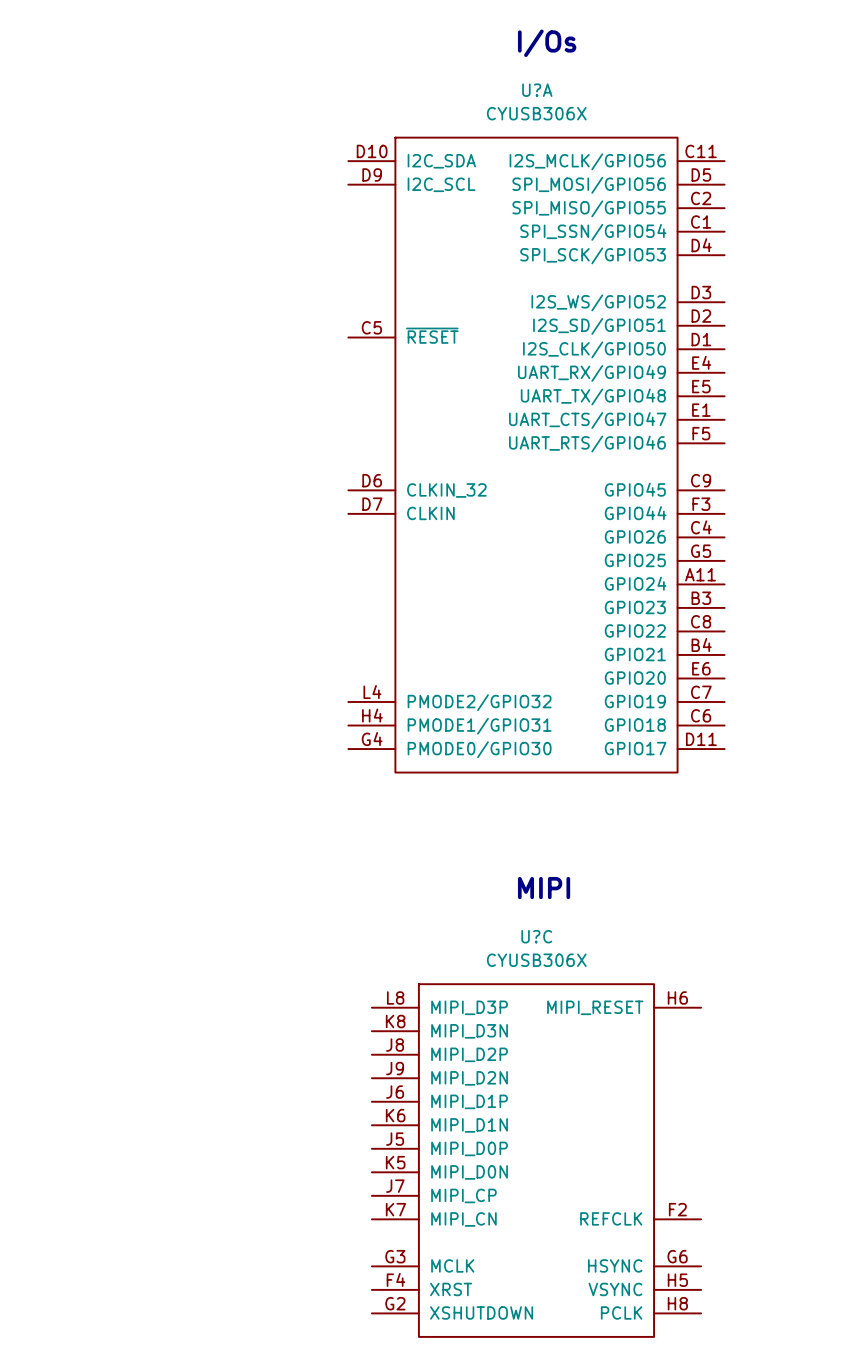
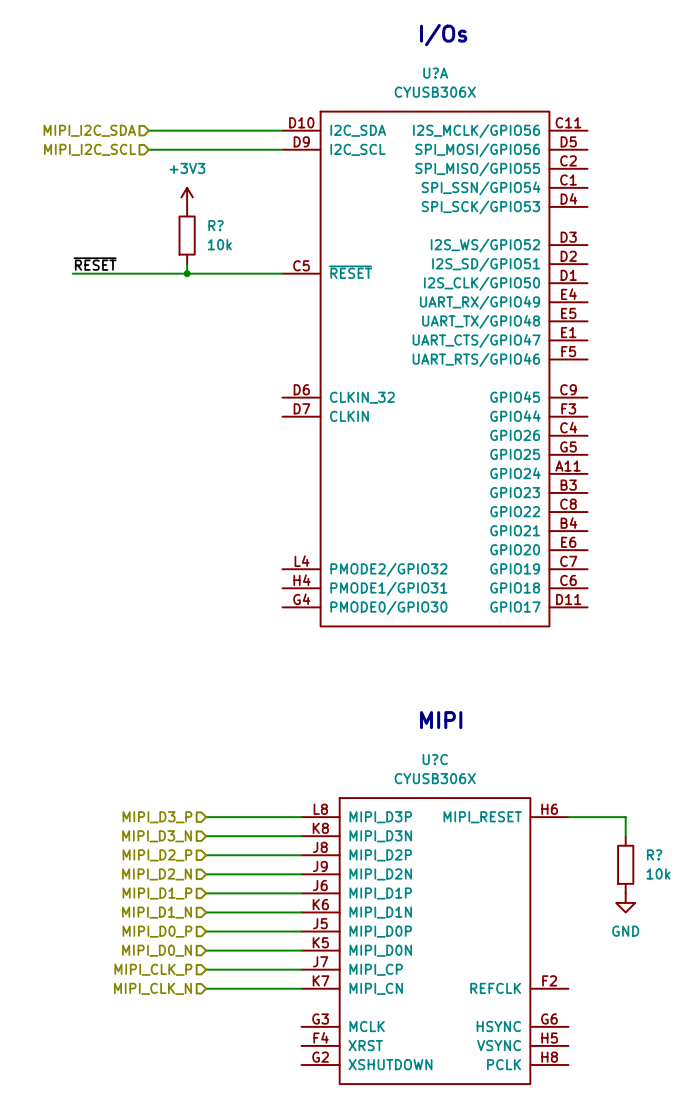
hierarchical label: none -> MIPI_I2C_SDA (89, 130)
wire: none -> (148, 130) (282, 130)
hierarchical label: none -> MIPI_I2C_SCL (90, 149)
wire: none -> (148, 149) (282, 149)
power symbol: none -> +3V3 (187, 197)
R?: none -> 10k (187, 235)
label: none -> ~{RESET} (95, 264)
wire: none -> (187, 264) (187, 273)
wire: none -> (72, 273) (282, 273)
junction: none -> (187, 273)
hierarchical label: none -> MIPI_D3_P (157, 817)
wire: none -> (206, 817) (301, 817)
wire: none -> (568, 817) (625, 817) (625, 836)
hierarchical label: none -> MIPI_D3_N (157, 836)
wire: none -> (206, 836) (301, 836)
hierarchical label: none -> MIPI_D2_P (157, 855)
wire: none -> (206, 855) (301, 855)
R?: none -> 10k (625, 864)
hierarchical label: none -> MIPI_D2_N (157, 874)
wire: none -> (206, 874) (301, 874)
hierarchical label: none -> MIPI_D1_P (157, 893)
wire: none -> (206, 893) (301, 893)
power symbol: none -> GND (625, 902)
hierarchical label: none -> MIPI_D1_N (157, 912)
wire: none -> (206, 912) (301, 912)
hierarchical label: none -> MIPI_D0_P (157, 931)
wire: none -> (206, 931) (301, 931)
hierarchical label: none -> MIPI_D0_N (157, 950)
wire: none -> (206, 950) (301, 950)
hierarchical label: none -> MIPI_CLK_P (153, 969)
wire: none -> (206, 969) (301, 969)
hierarchical label: none -> MIPI_CLK_N (152, 988)
wire: none -> (206, 988) (301, 988)

